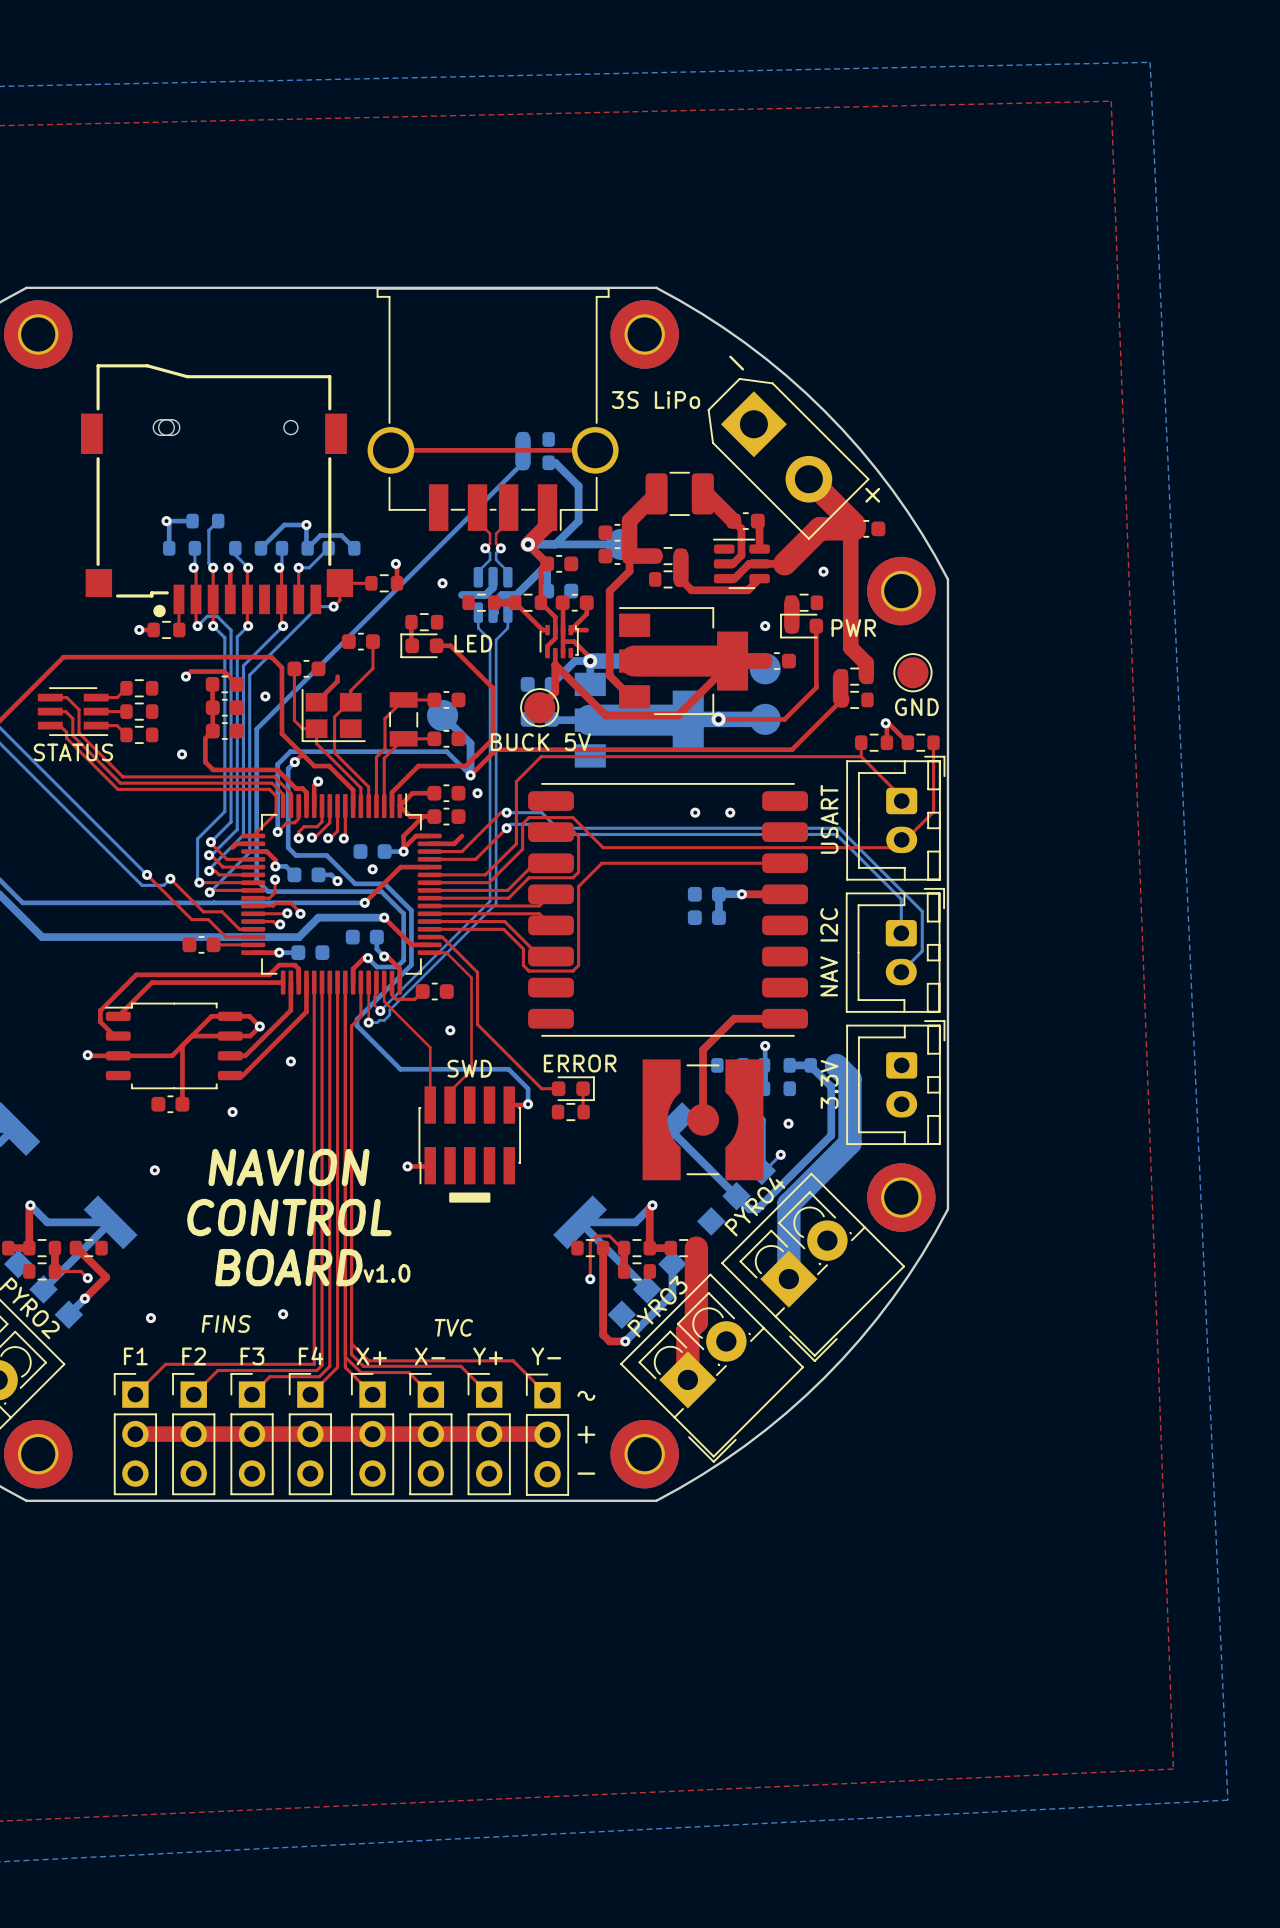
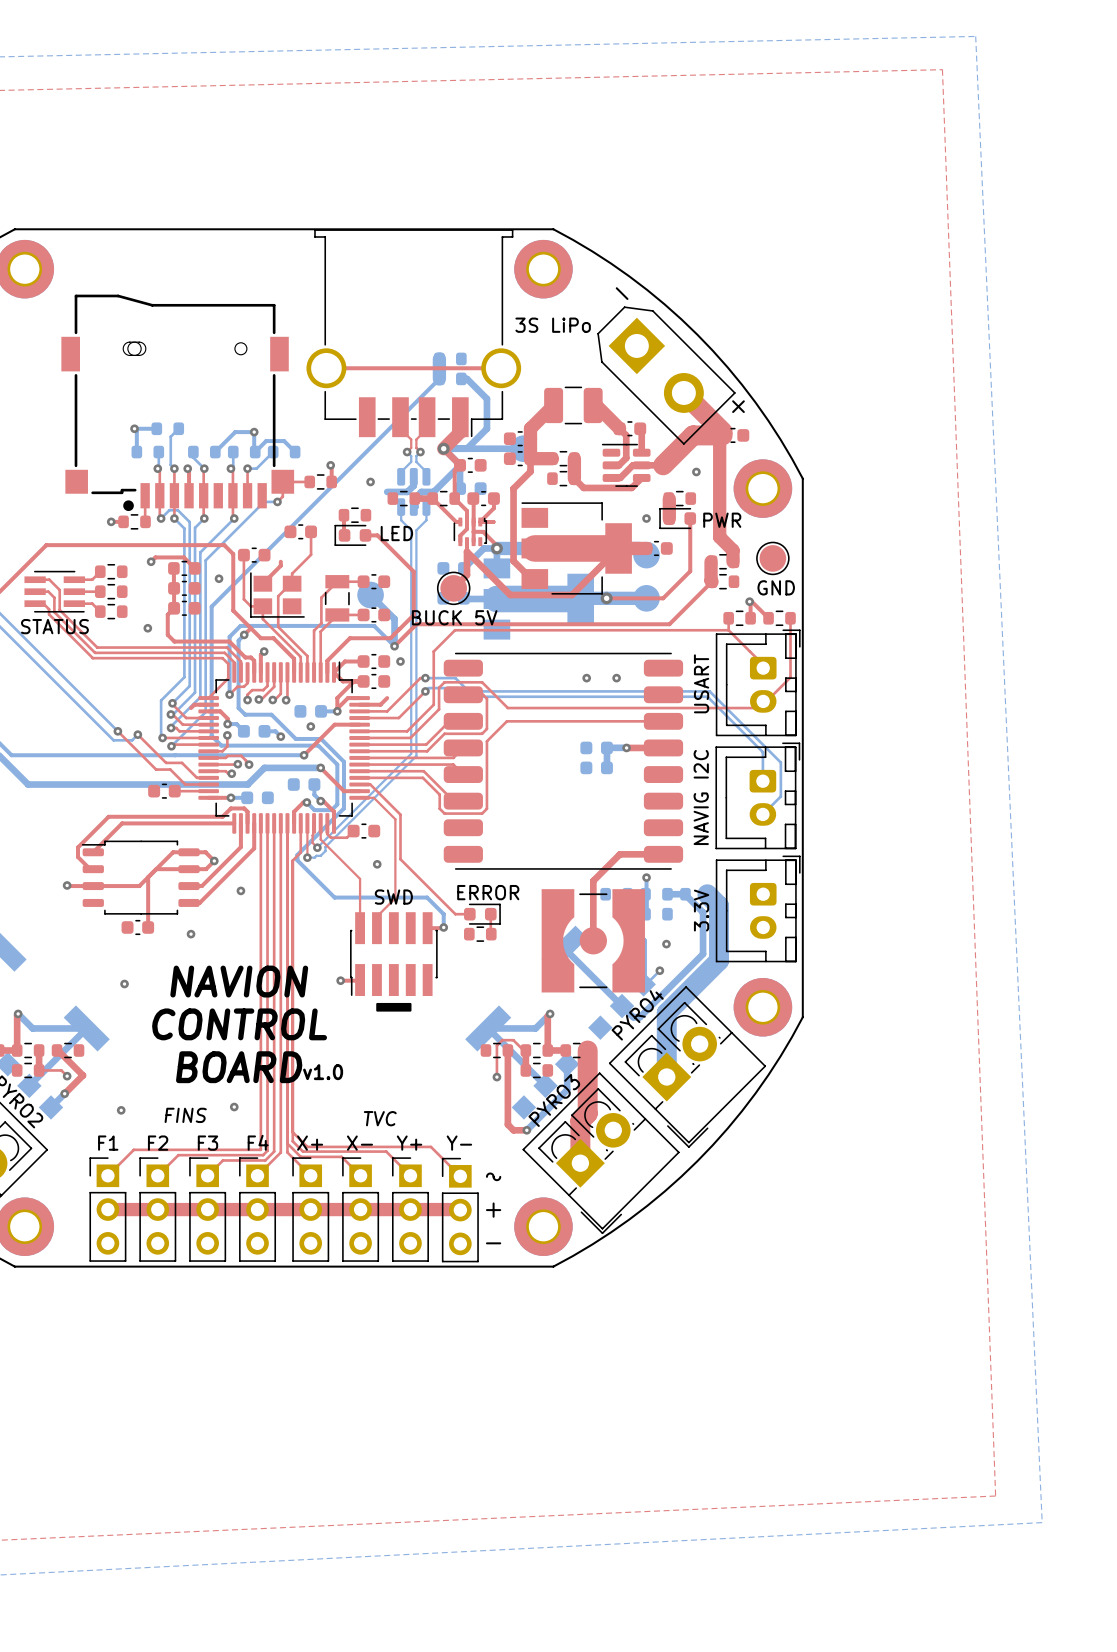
part value: NAV I2C (829, 952) -> NAVIG I2C (701, 797)

